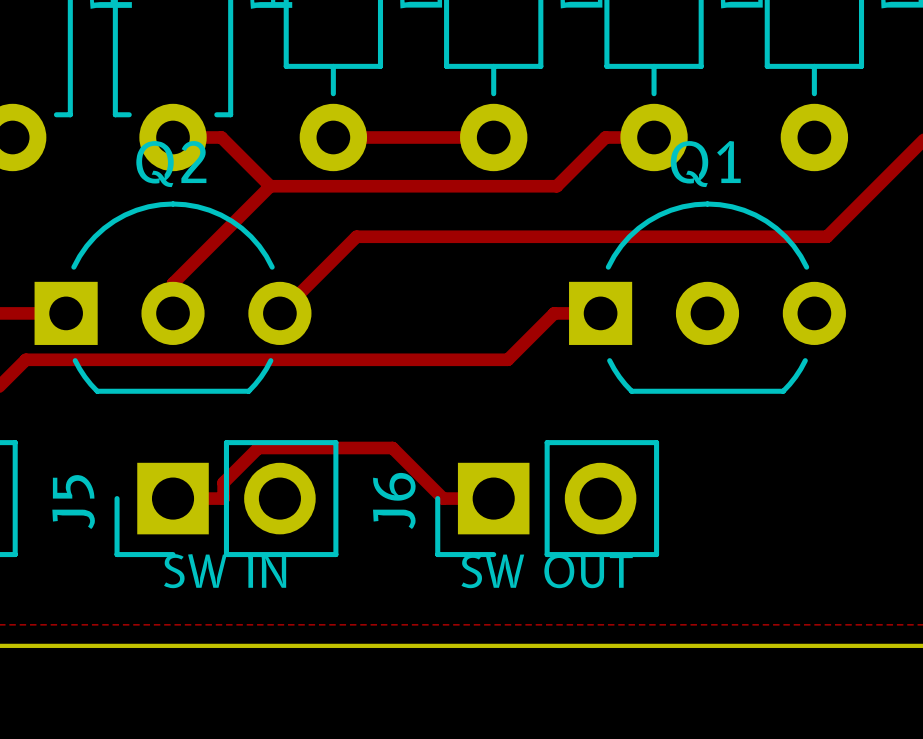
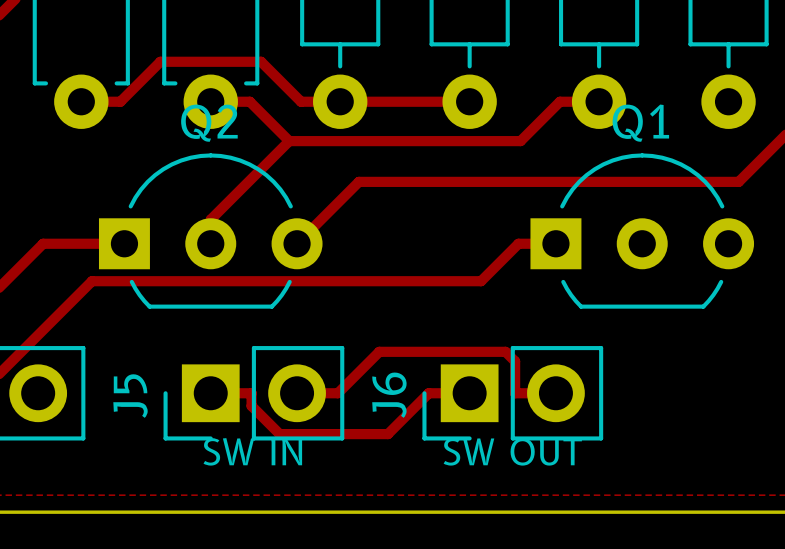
track: none -> (81, 101) (120, 101) (160, 61) (261, 61) (301, 101) (340, 101)
track: (223, 498) (223, 482) (258, 447) (392, 447) (443, 498) -> (251, 393) (251, 406) (279, 434) (387, 434) (428, 393)
track: none -> (297, 393) (337, 393) (379, 351) (505, 351) (515, 361) (515, 393) (555, 393)

